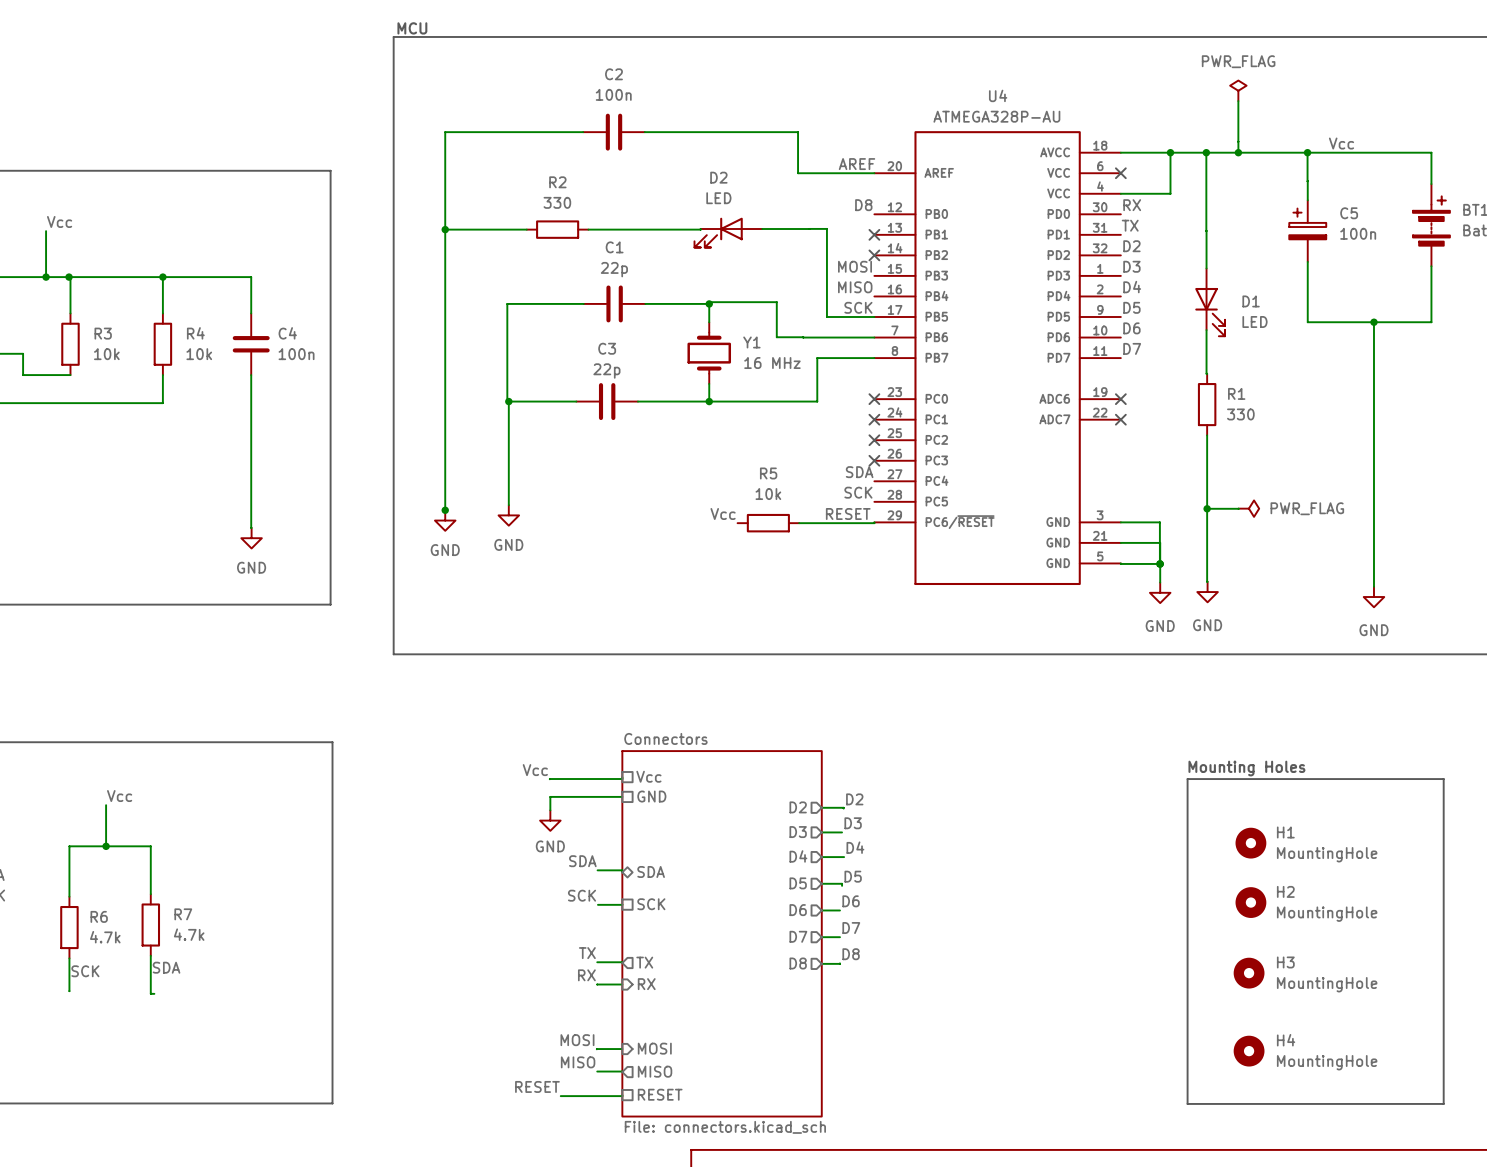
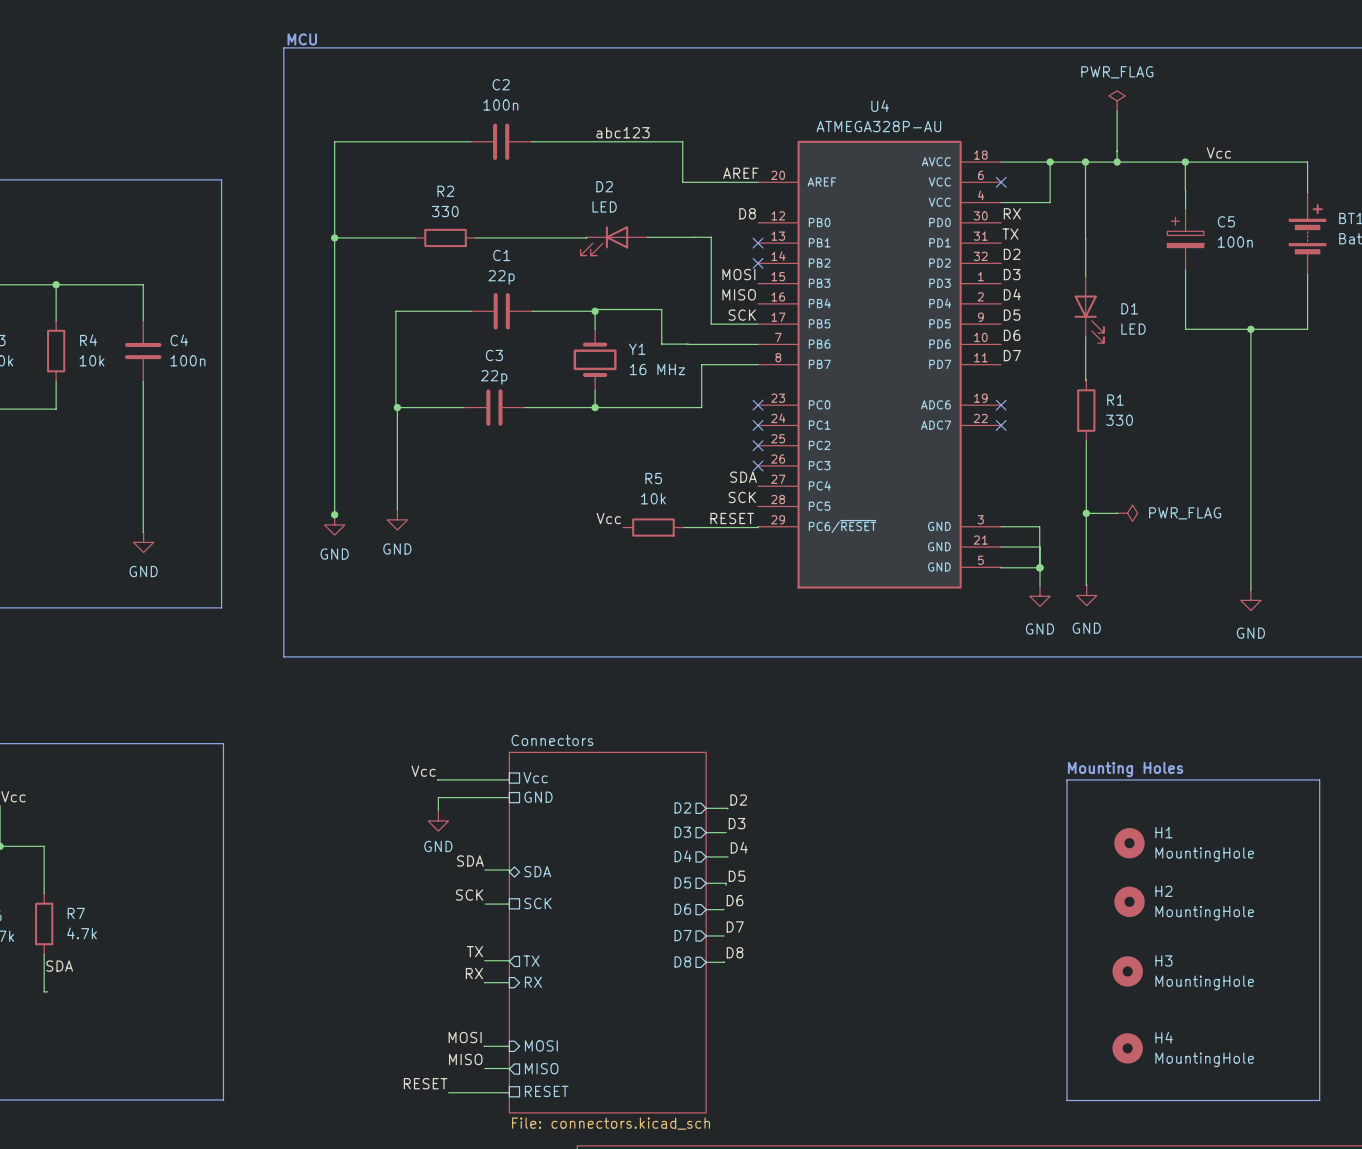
label: none -> abc123 (623, 132)

